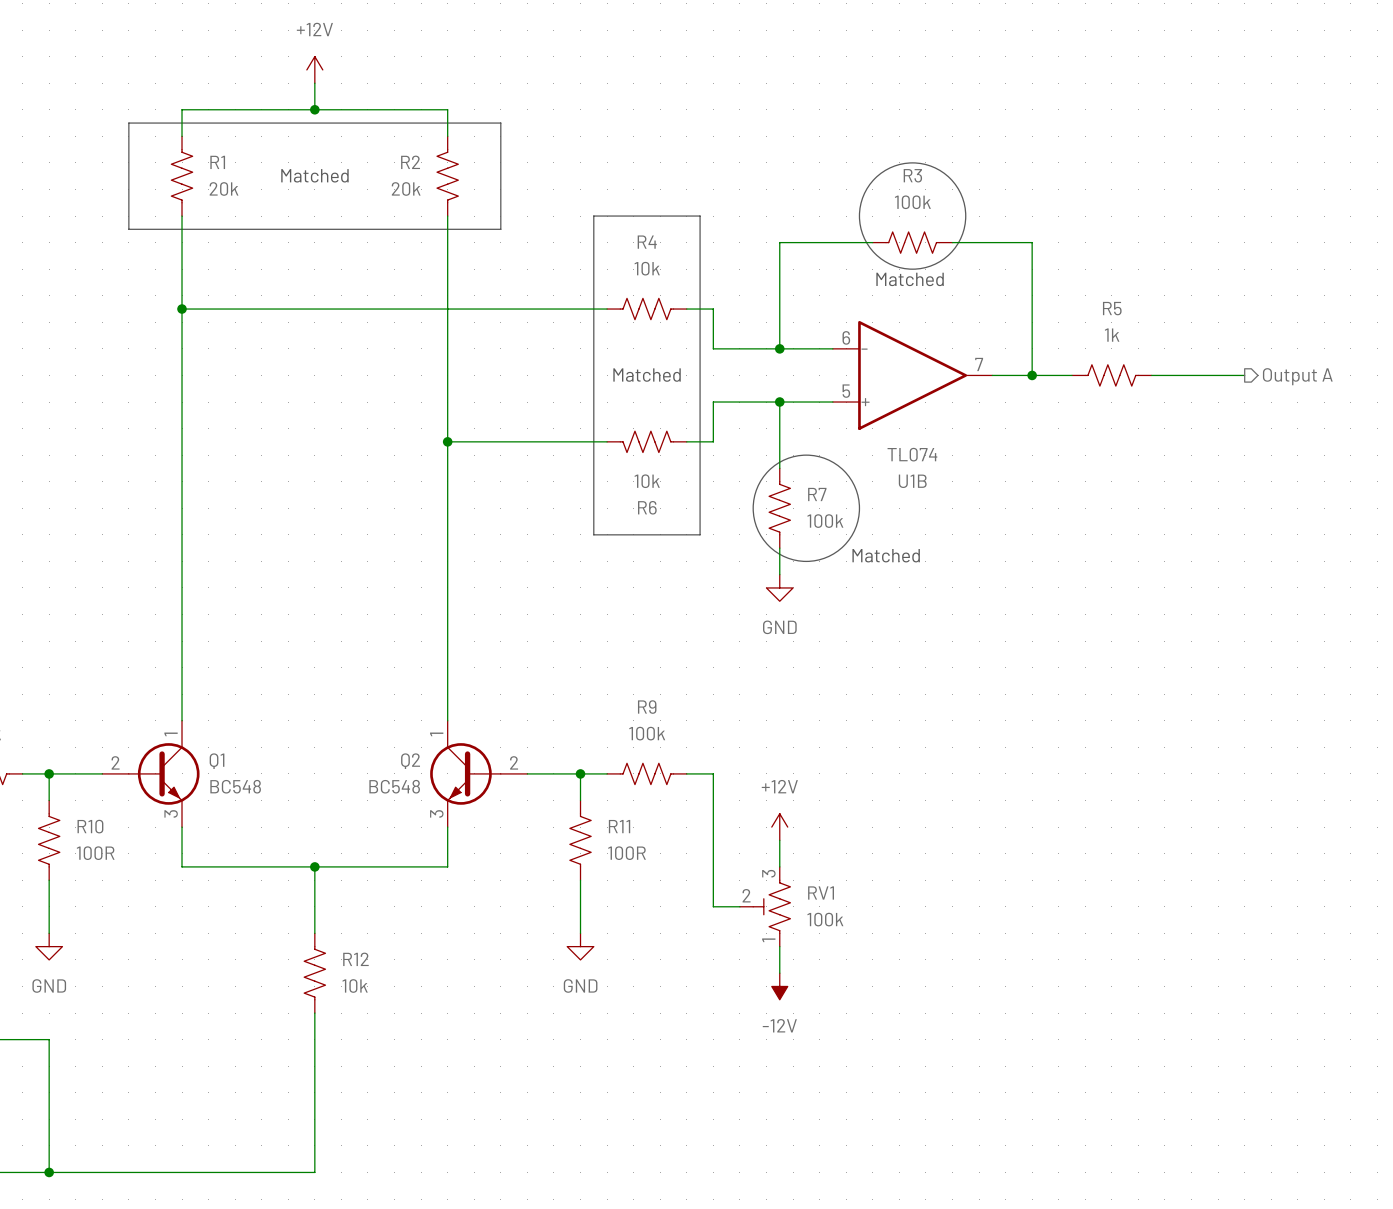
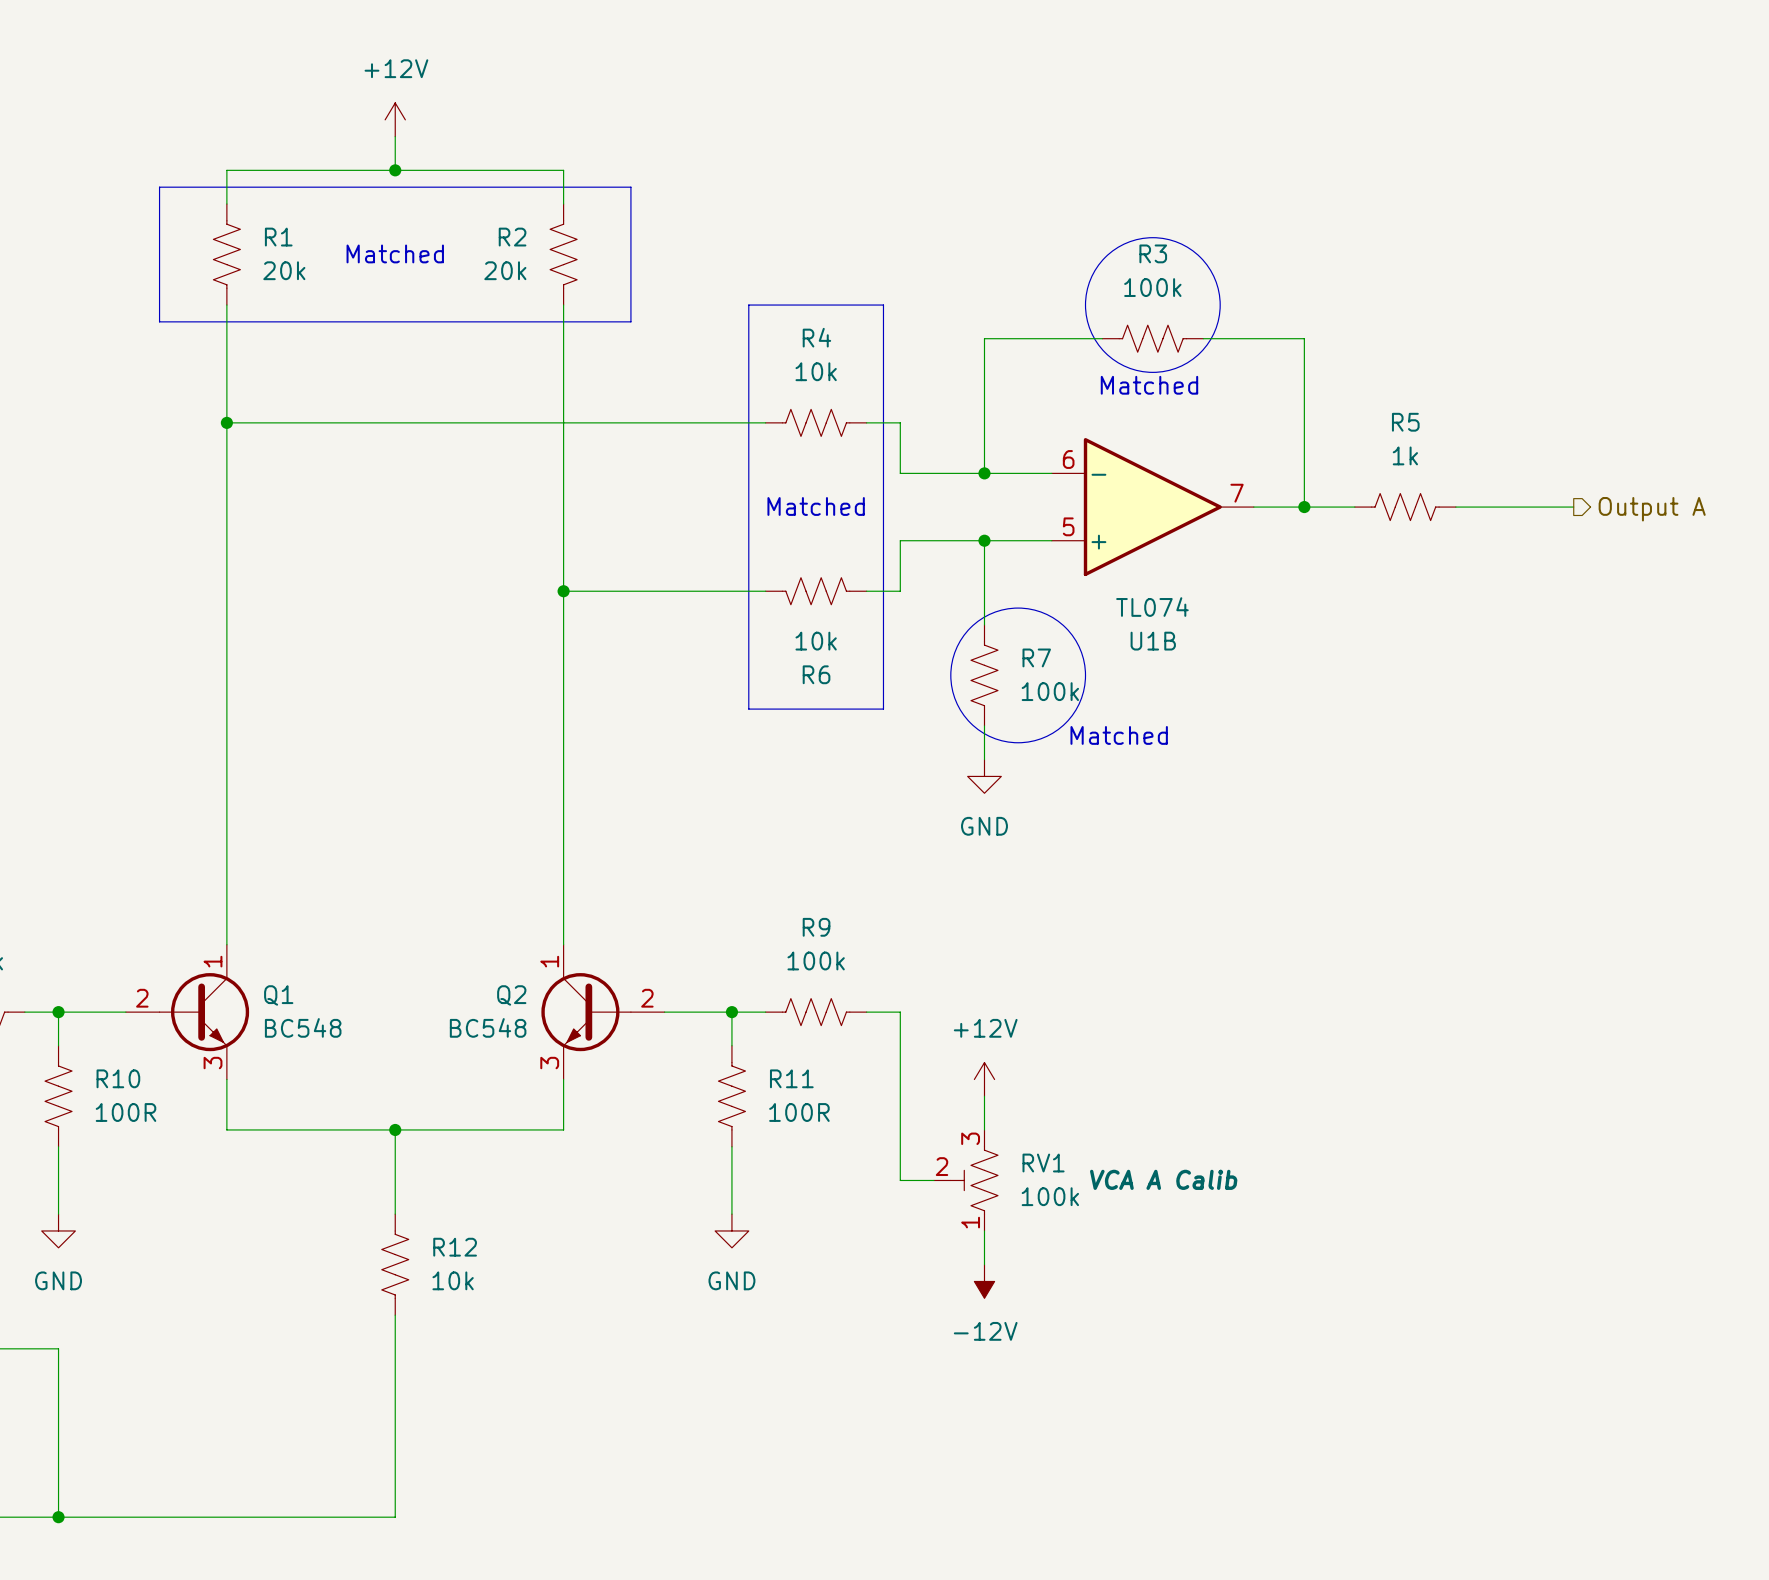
RV1 text: none -> VCA A Calib (1163, 1179)

